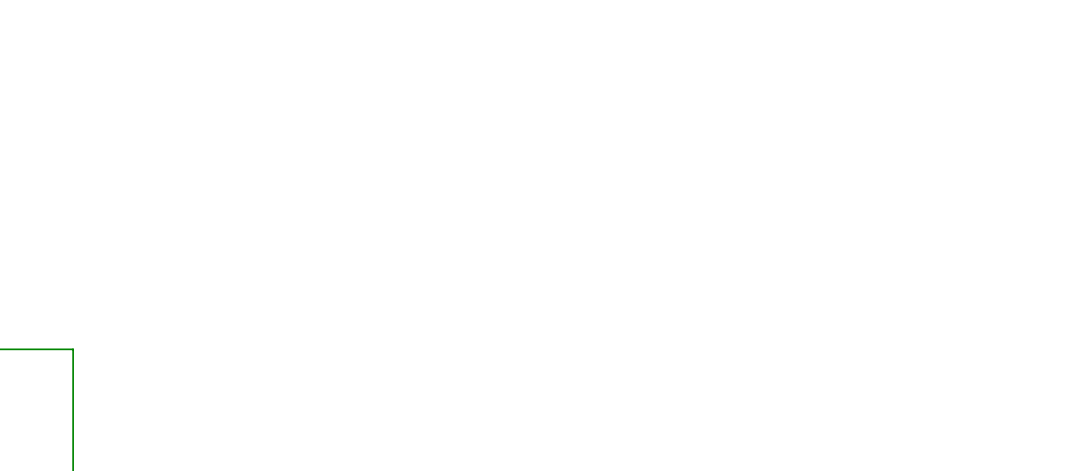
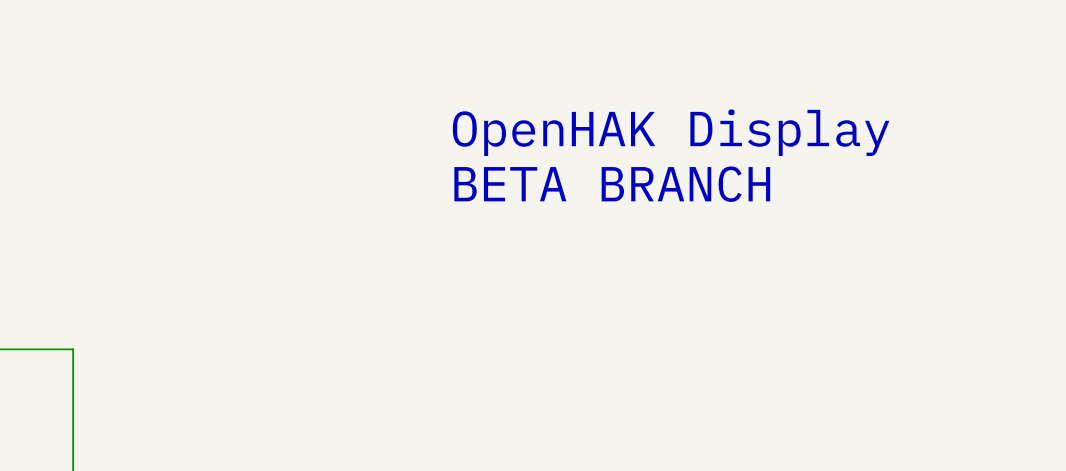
text: none -> OpenHAK Display (671, 132)
text: none -> BETA BRANCH (612, 184)

